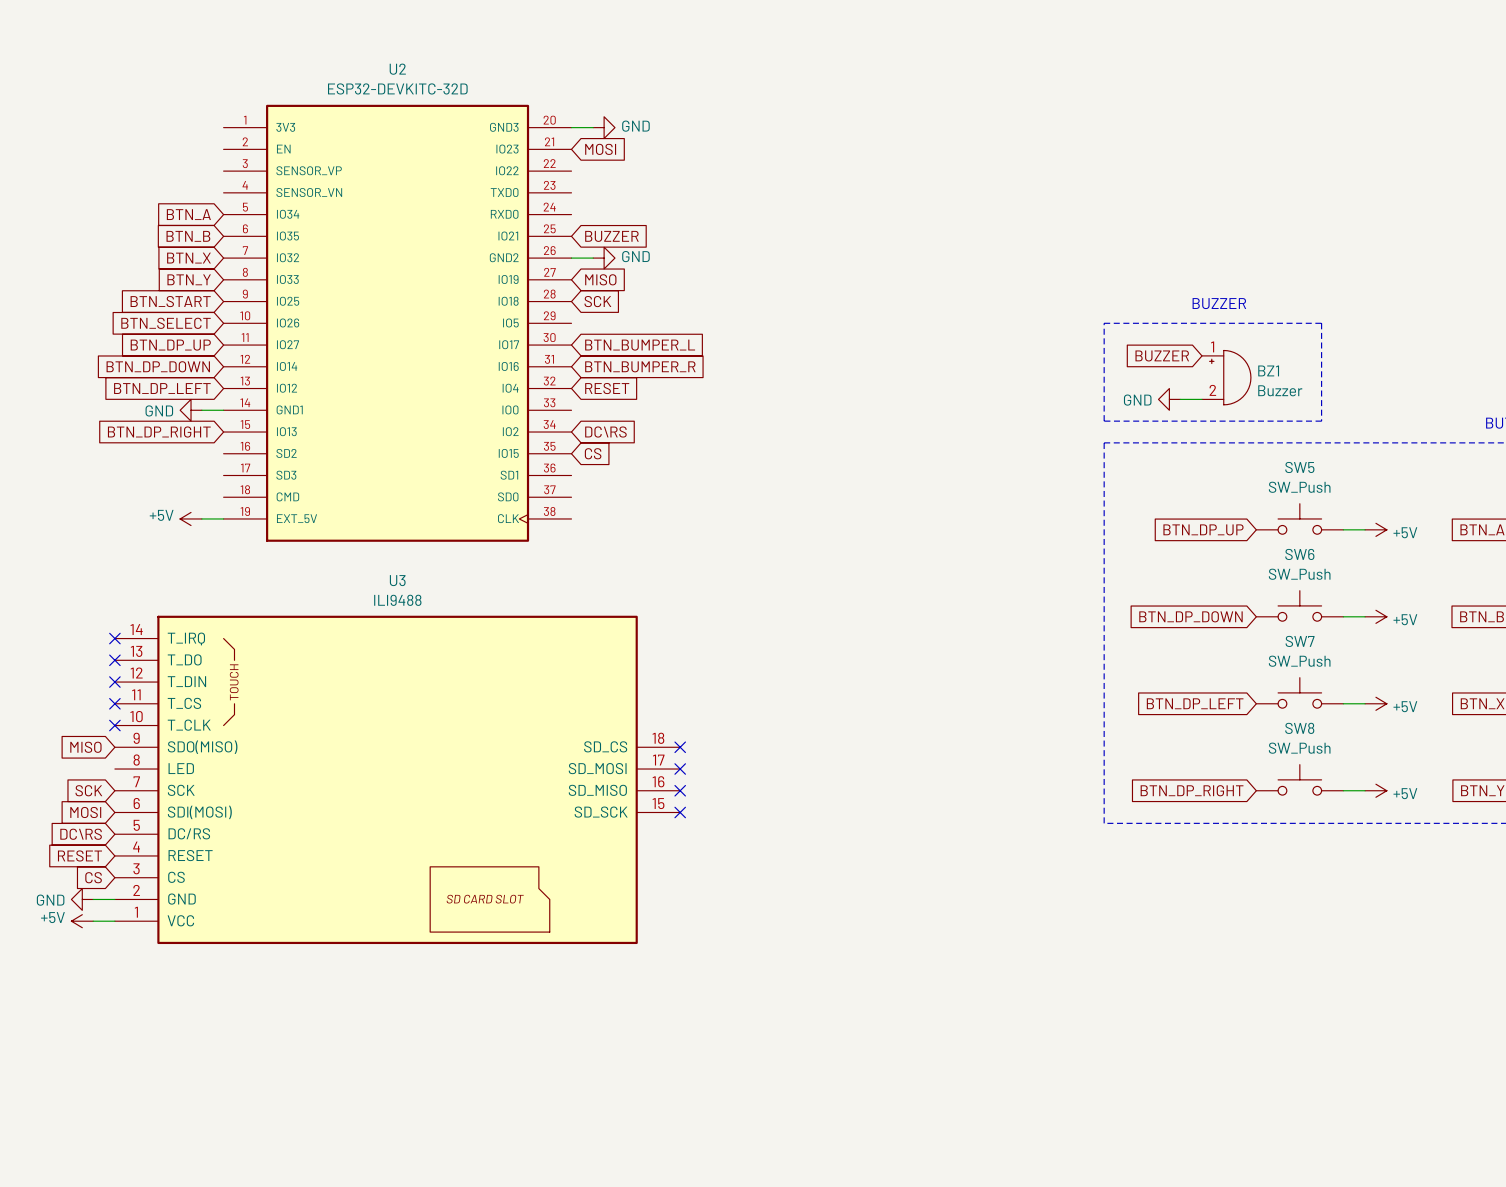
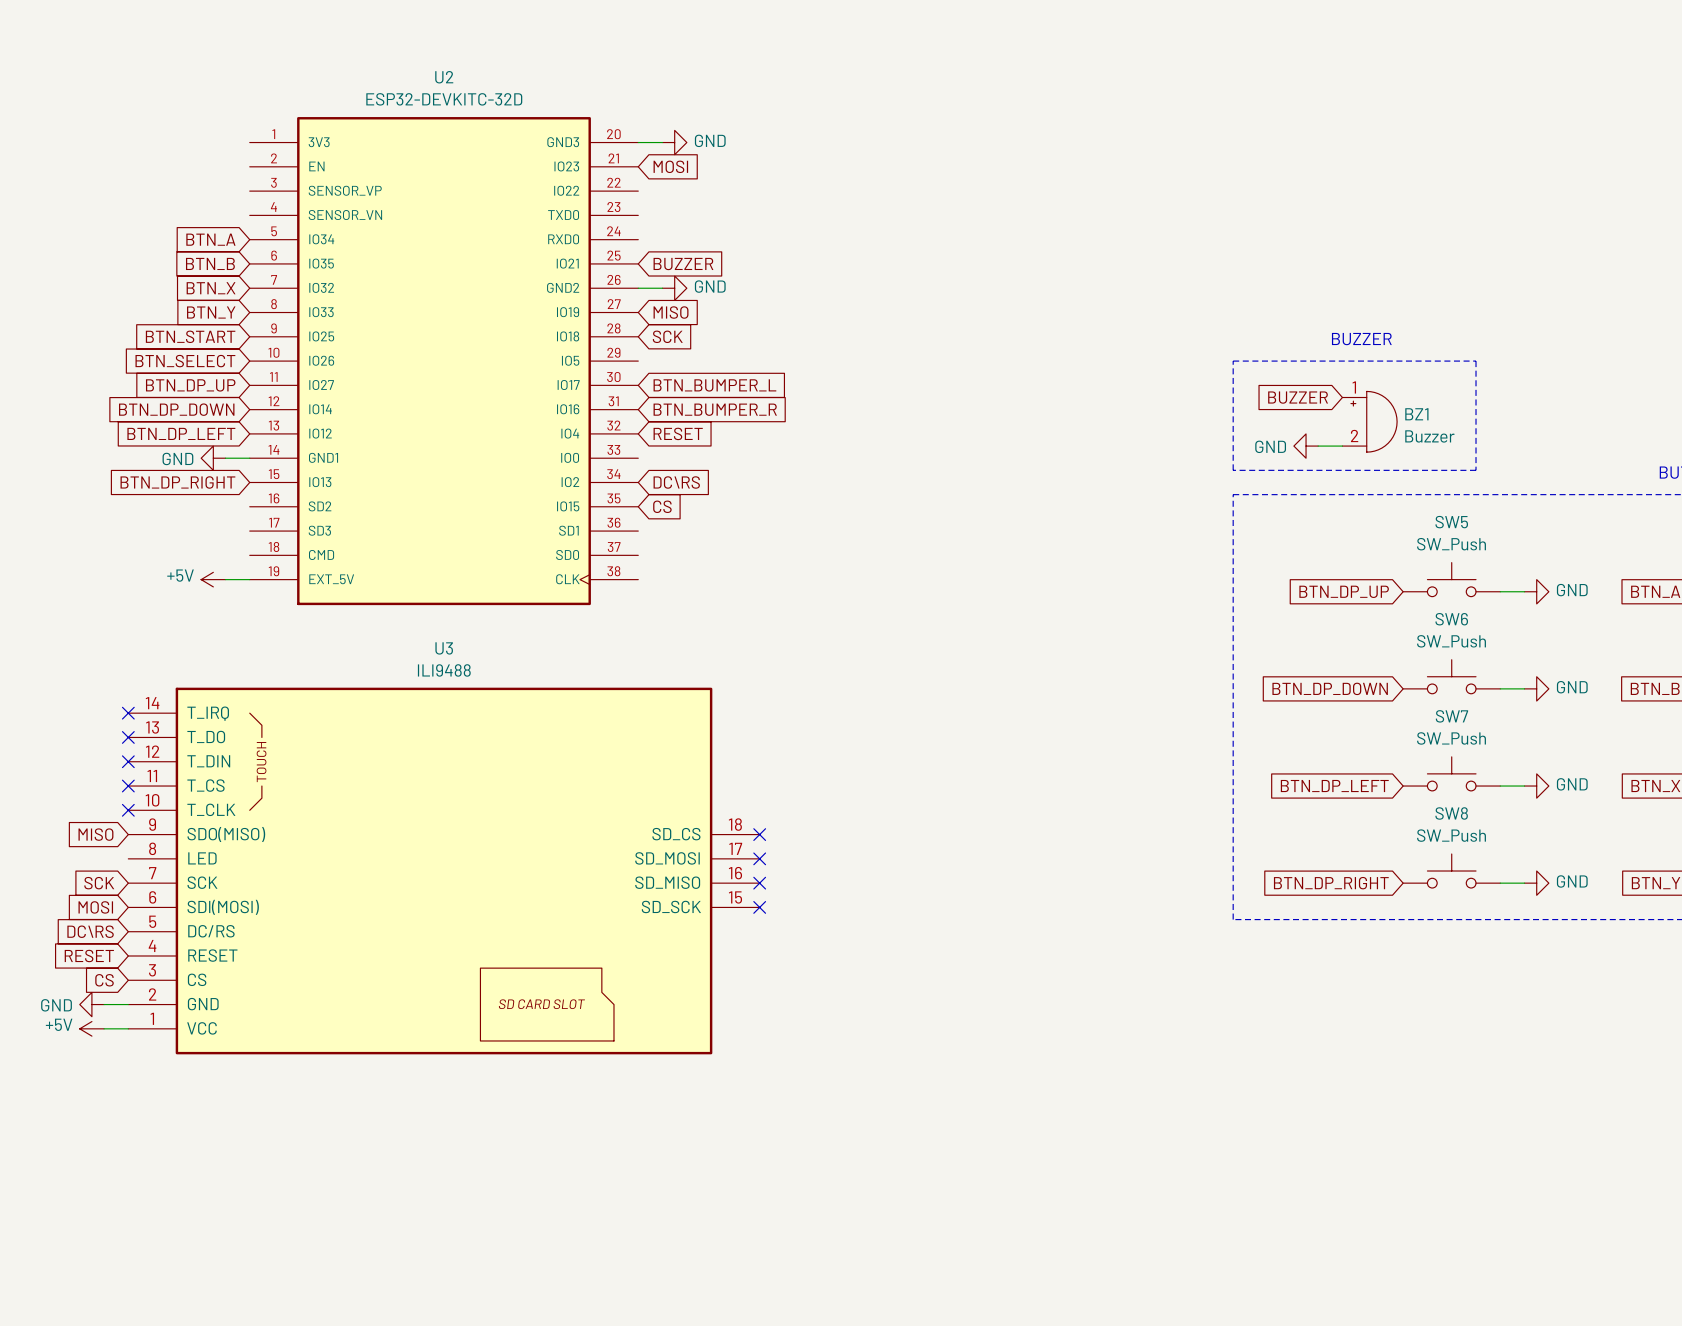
power symbol: +5V (1375, 529) -> GND (1536, 591)
power symbol: +5V (1375, 616) -> GND (1536, 688)
power symbol: +5V (1375, 703) -> GND (1536, 786)
power symbol: +5V (1375, 790) -> GND (1536, 883)

